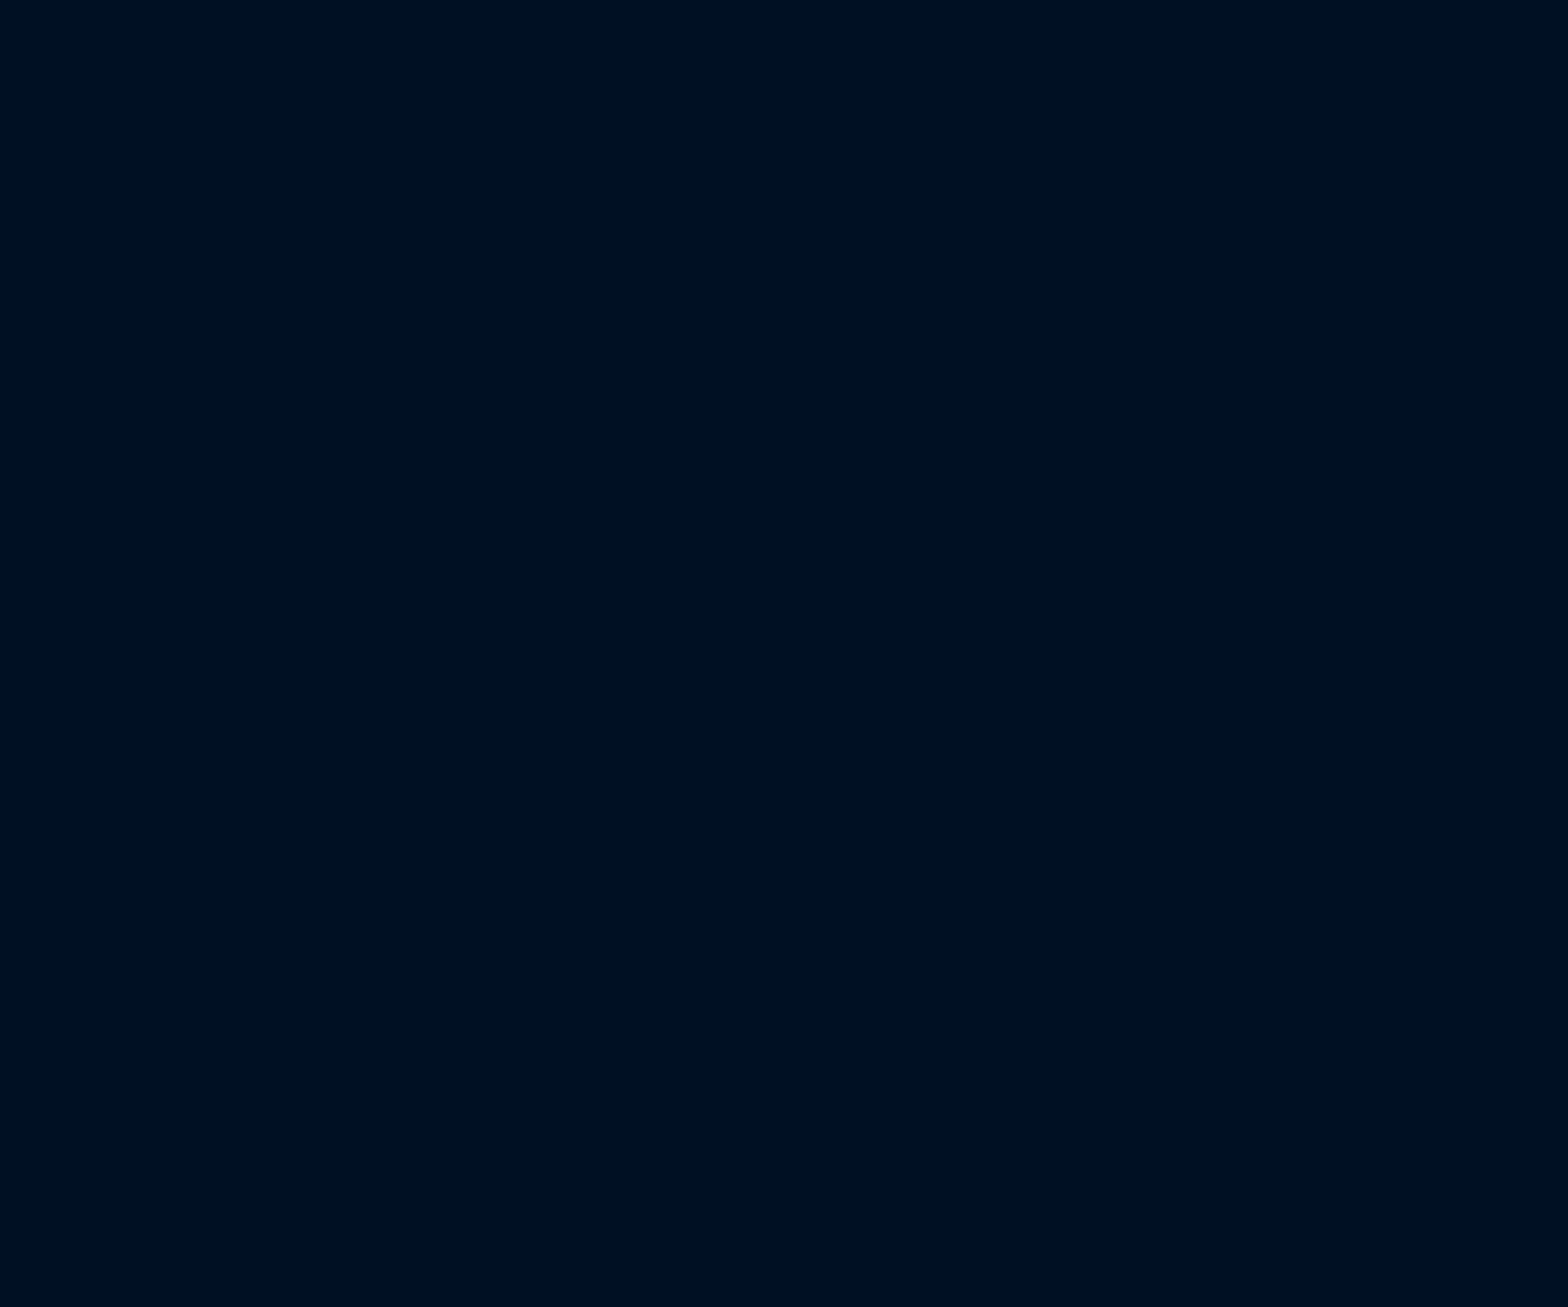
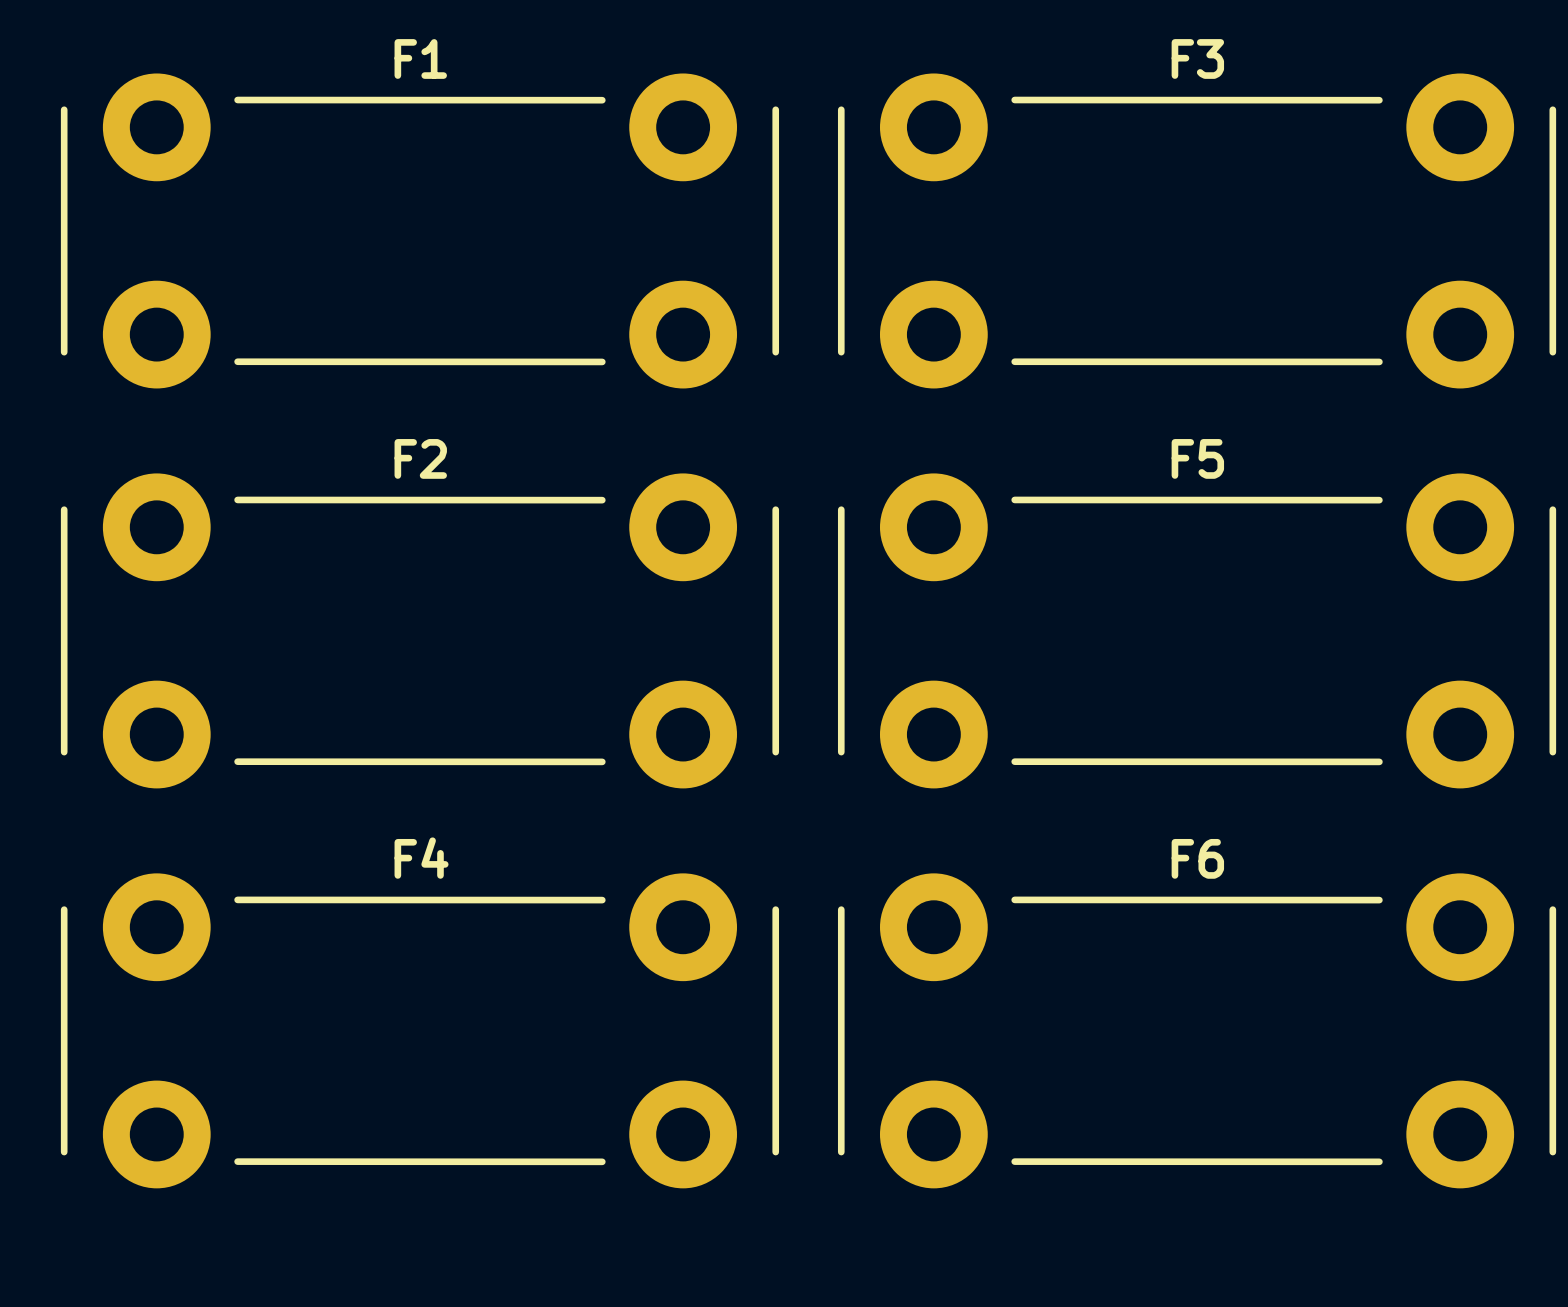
F1: none -> (419, 230)
F3: none -> (1197, 230)
F2: none -> (419, 630)
F5: none -> (1197, 630)
F4: none -> (419, 1030)
F6: none -> (1197, 1030)

